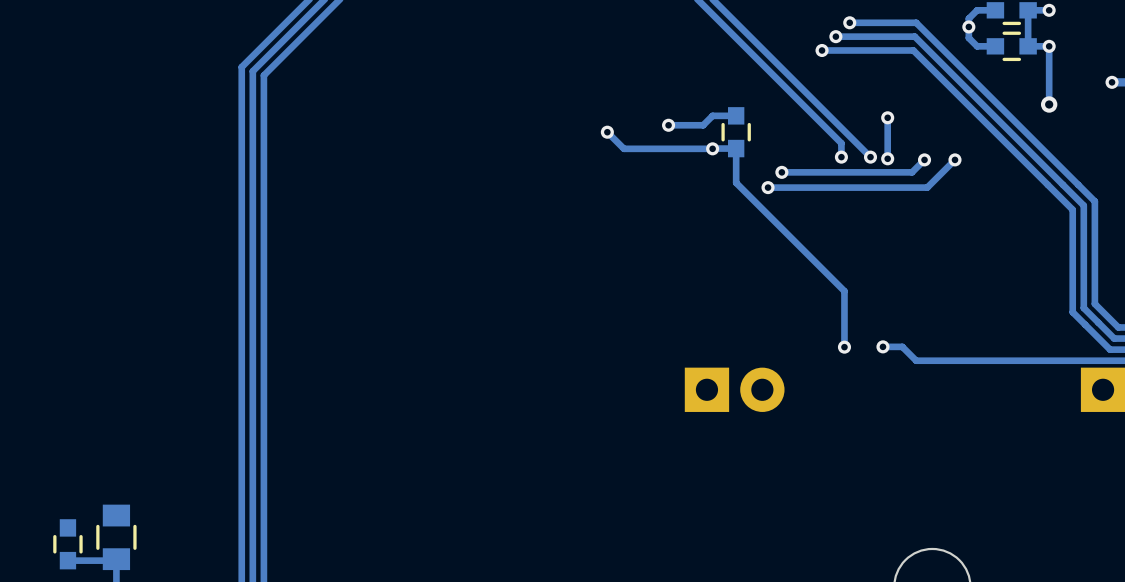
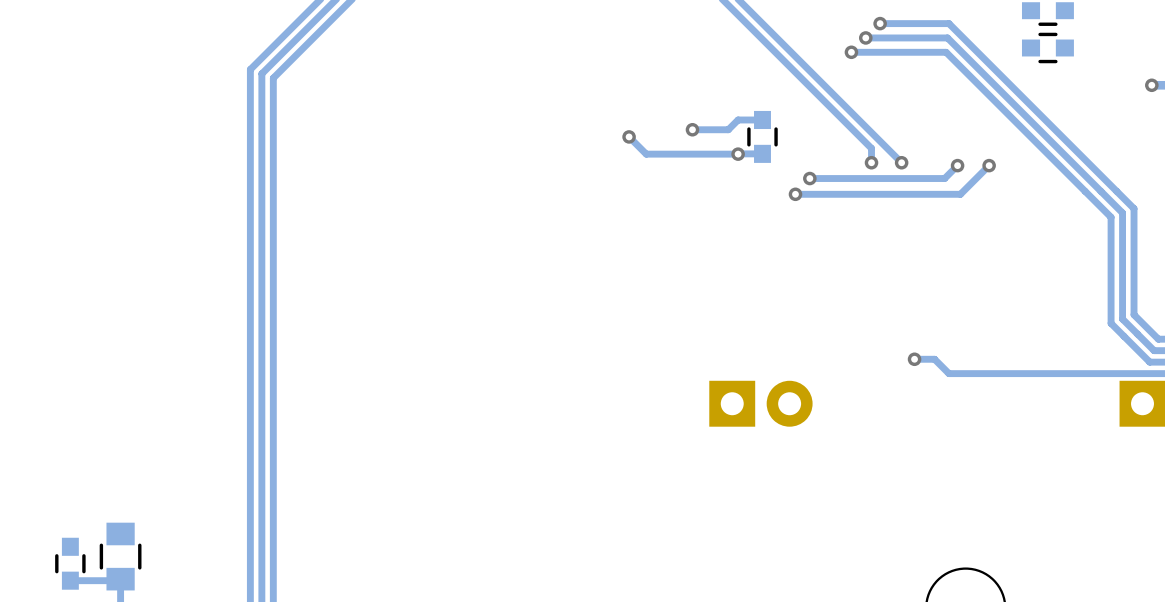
track: (995, 10) (977, 10) (968, 18) (968, 38) (977, 46) (995, 46) -> none
track: (1049, 10) (1028, 10) (1028, 46) (1049, 46) (1049, 104) -> none
via: (1049, 10) -> none
via: (968, 26) -> none
via: (1049, 46) -> none
via: (1049, 104) -> none
track: (887, 117) (887, 158) -> none
via: (887, 117) -> none
track: (736, 148) (736, 182) (844, 291) (844, 347) -> none
via: (887, 158) -> none
via: (844, 347) -> none

